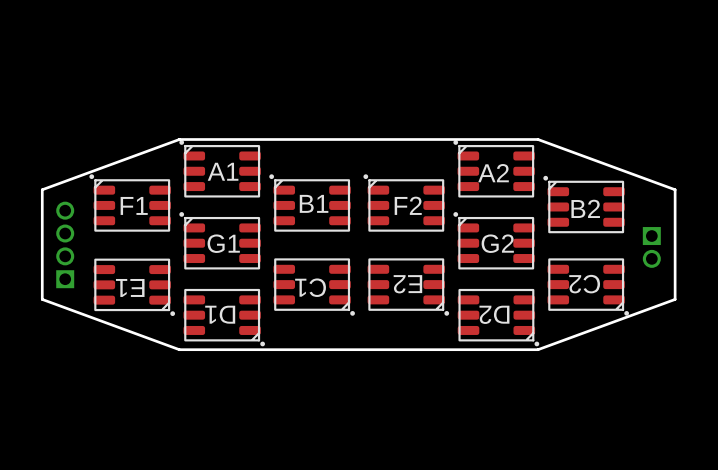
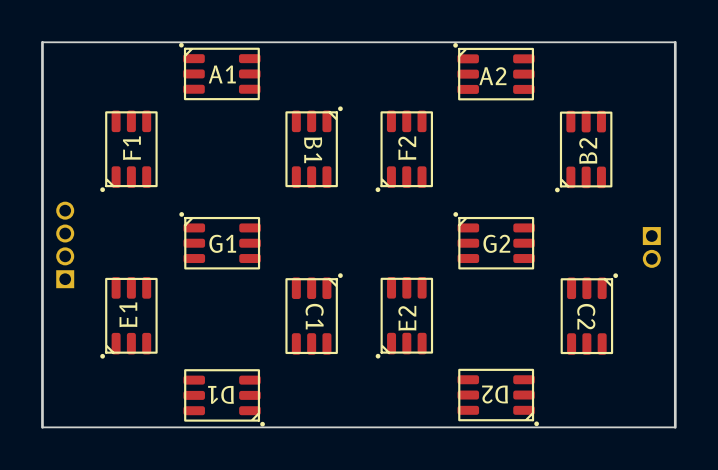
board edge: (179, 139) (42, 189) (42, 299) (179, 349) (538, 349) (675, 299) (675, 189) (538, 139) (179, 139) -> (42, 42) (42, 427) (675, 427) (675, 42) (42, 42)
A1 position: (220, 168) -> (219, 71)
A2 position: (494, 168) -> (493, 71)
F1 rotation: 0° (130, 203) -> 90° counterclockwise (128, 151)
F1 position: (130, 203) -> (128, 151)
B1 rotation: 0° (310, 203) -> 90° clockwise (314, 147)
B1 position: (310, 203) -> (314, 147)
F2 rotation: 0° (404, 203) -> 90° counterclockwise (404, 151)
F2 position: (404, 203) -> (404, 151)
B2 rotation: 0° (584, 204) -> 90° counterclockwise (583, 151)
B2 position: (584, 204) -> (583, 151)
E1 rotation: 0° (134, 287) -> 90° clockwise (128, 317)
C1 rotation: 0° (314, 287) -> 90° counterclockwise (314, 314)
E2 rotation: 0° (408, 287) -> 90° clockwise (404, 317)
C2 rotation: 0° (588, 287) -> 90° counterclockwise (589, 314)
D1 position: (224, 317) -> (224, 397)
D2 position: (498, 317) -> (498, 397)

